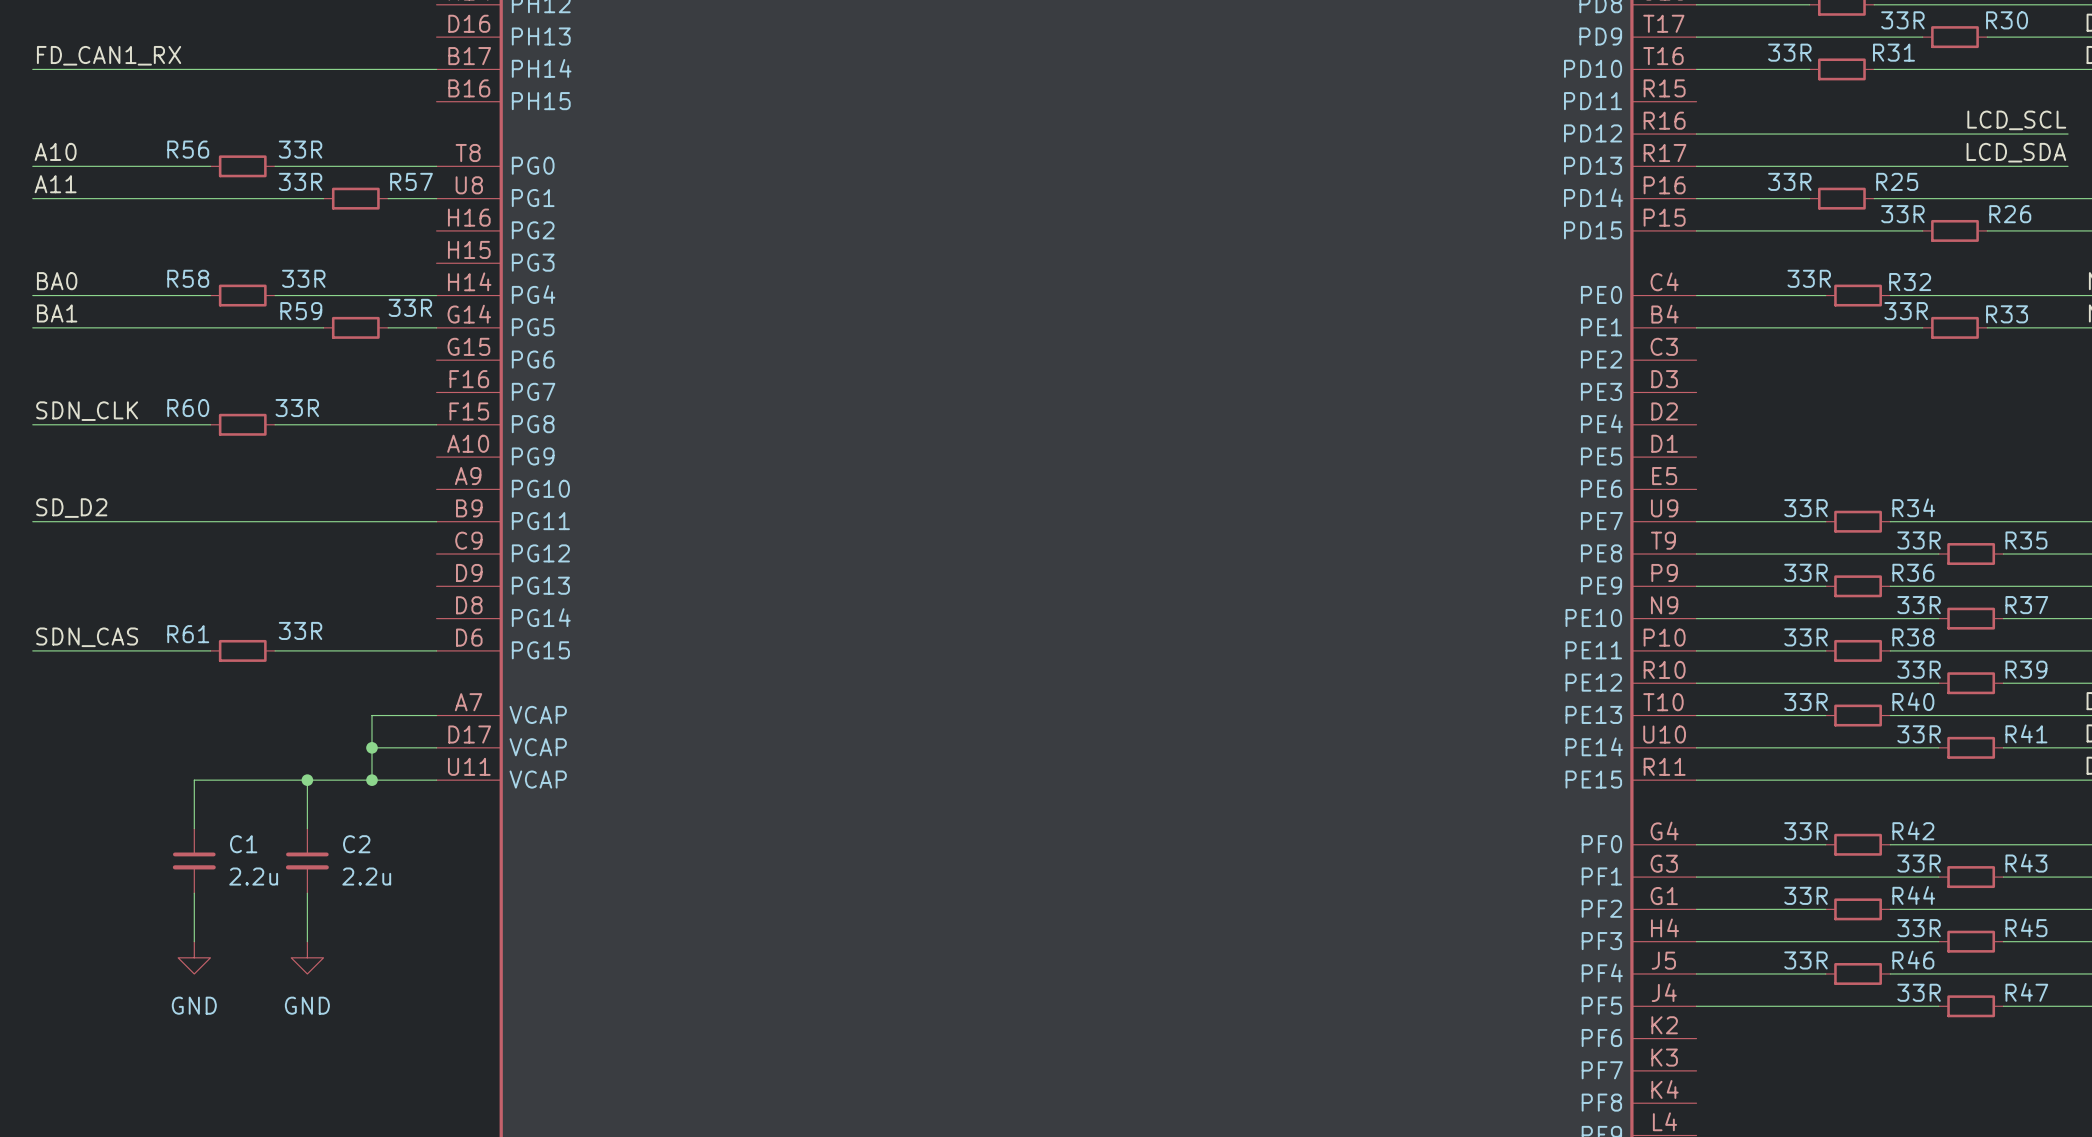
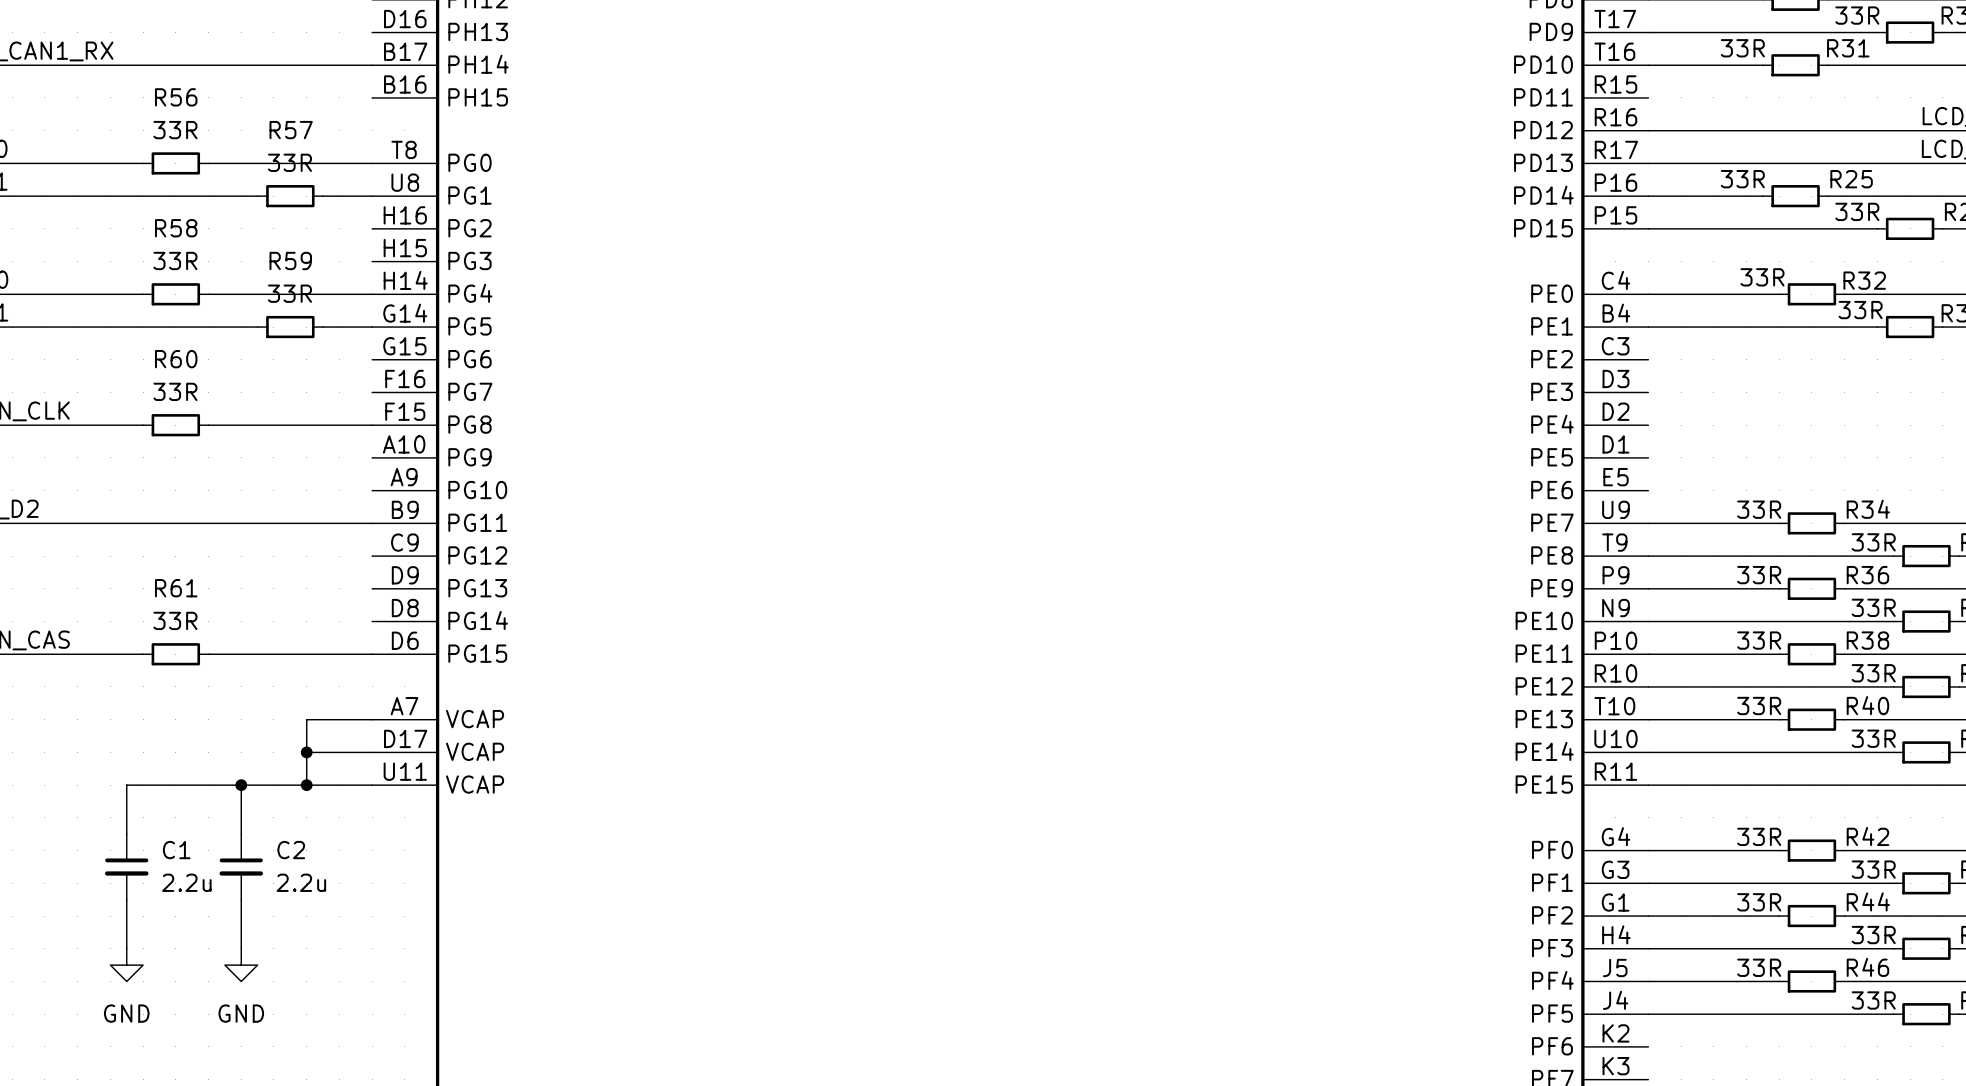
R56 name position: R56 (188, 149) -> R56 (176, 97)
R56 value position: 33R (300, 149) -> 33R (175, 130)
R57 value position: 33R (300, 181) -> 33R (289, 162)
R57 name position: R57 (411, 181) -> R57 (291, 130)
R58 name position: R58 (188, 278) -> R58 (176, 228)
R58 value position: 33R (303, 278) -> 33R (175, 260)
R59 value position: 33R (410, 307) -> 33R (289, 293)
R59 name position: R59 (301, 311) -> R59 (290, 260)
R60 name position: R60 (188, 408) -> R60 (176, 359)
R60 value position: 33R (297, 408) -> 33R (175, 391)
R61 value position: 33R (300, 630) -> 33R (175, 620)
R61 name position: R61 (188, 634) -> R61 (176, 588)

